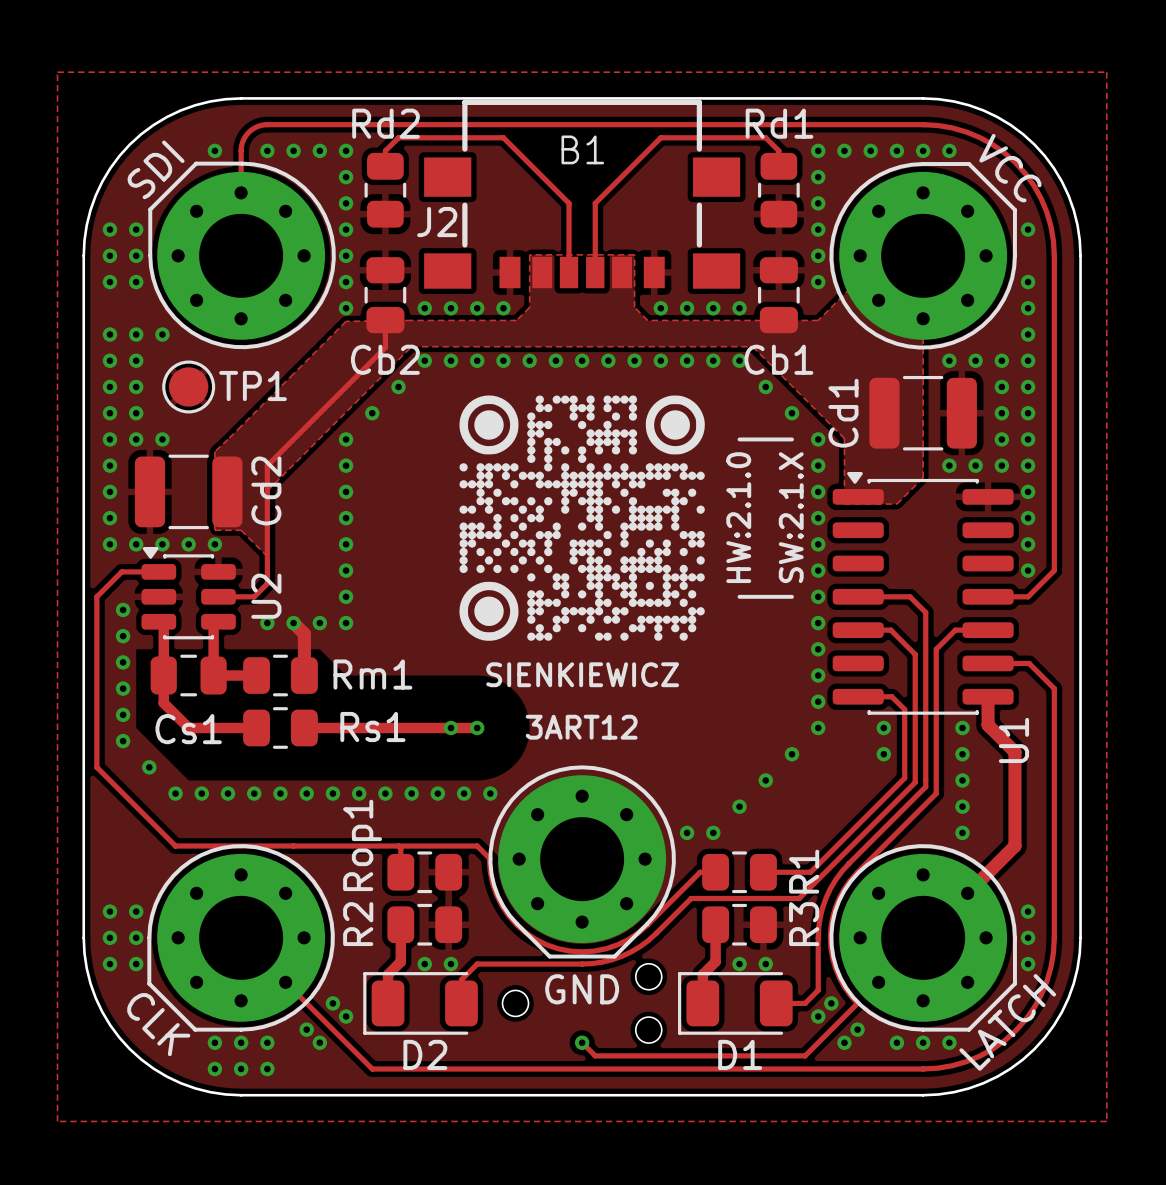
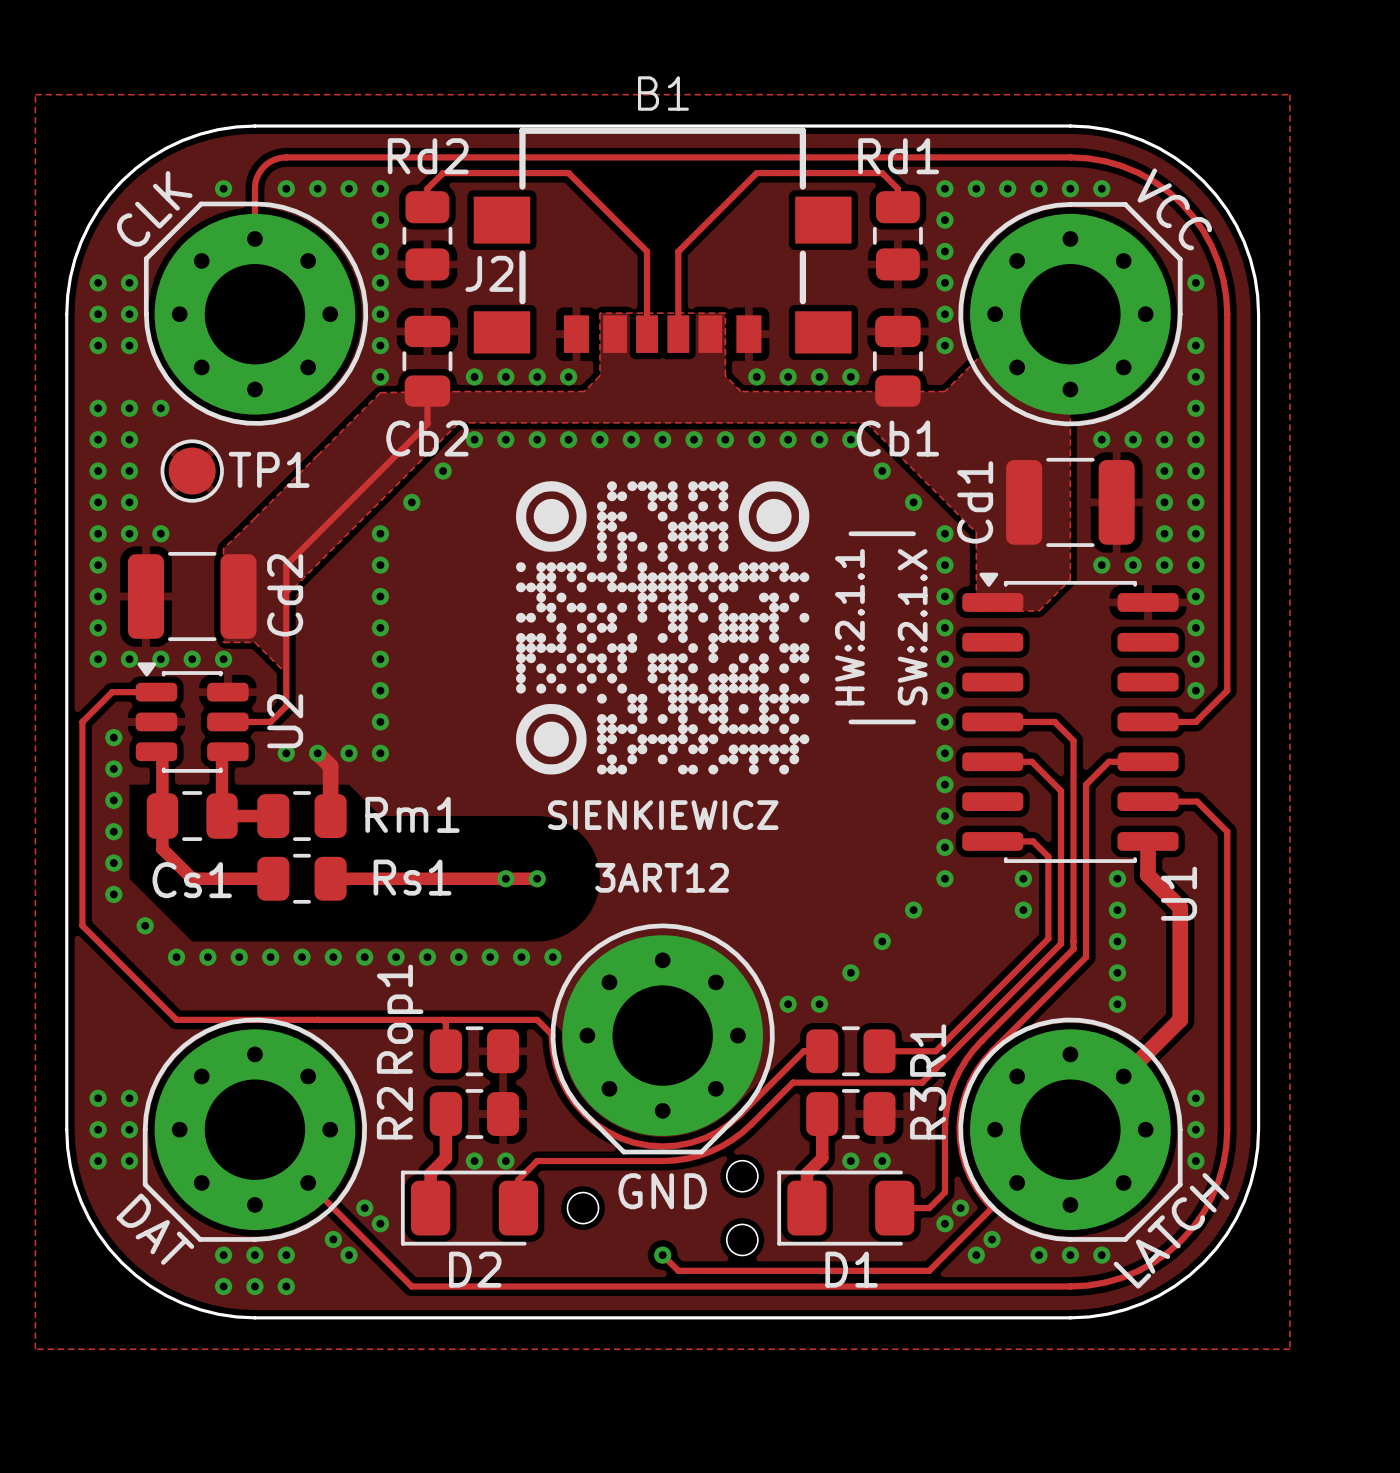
B1 name position: B1 (582, 149) -> B1 (663, 93)
text: SDI (156, 169) -> CLK (154, 208)
text: HW:2.1.0 (738, 517) -> HW:2.1.1 (849, 627)
text: CLK (158, 1024) -> DAT (155, 1229)

